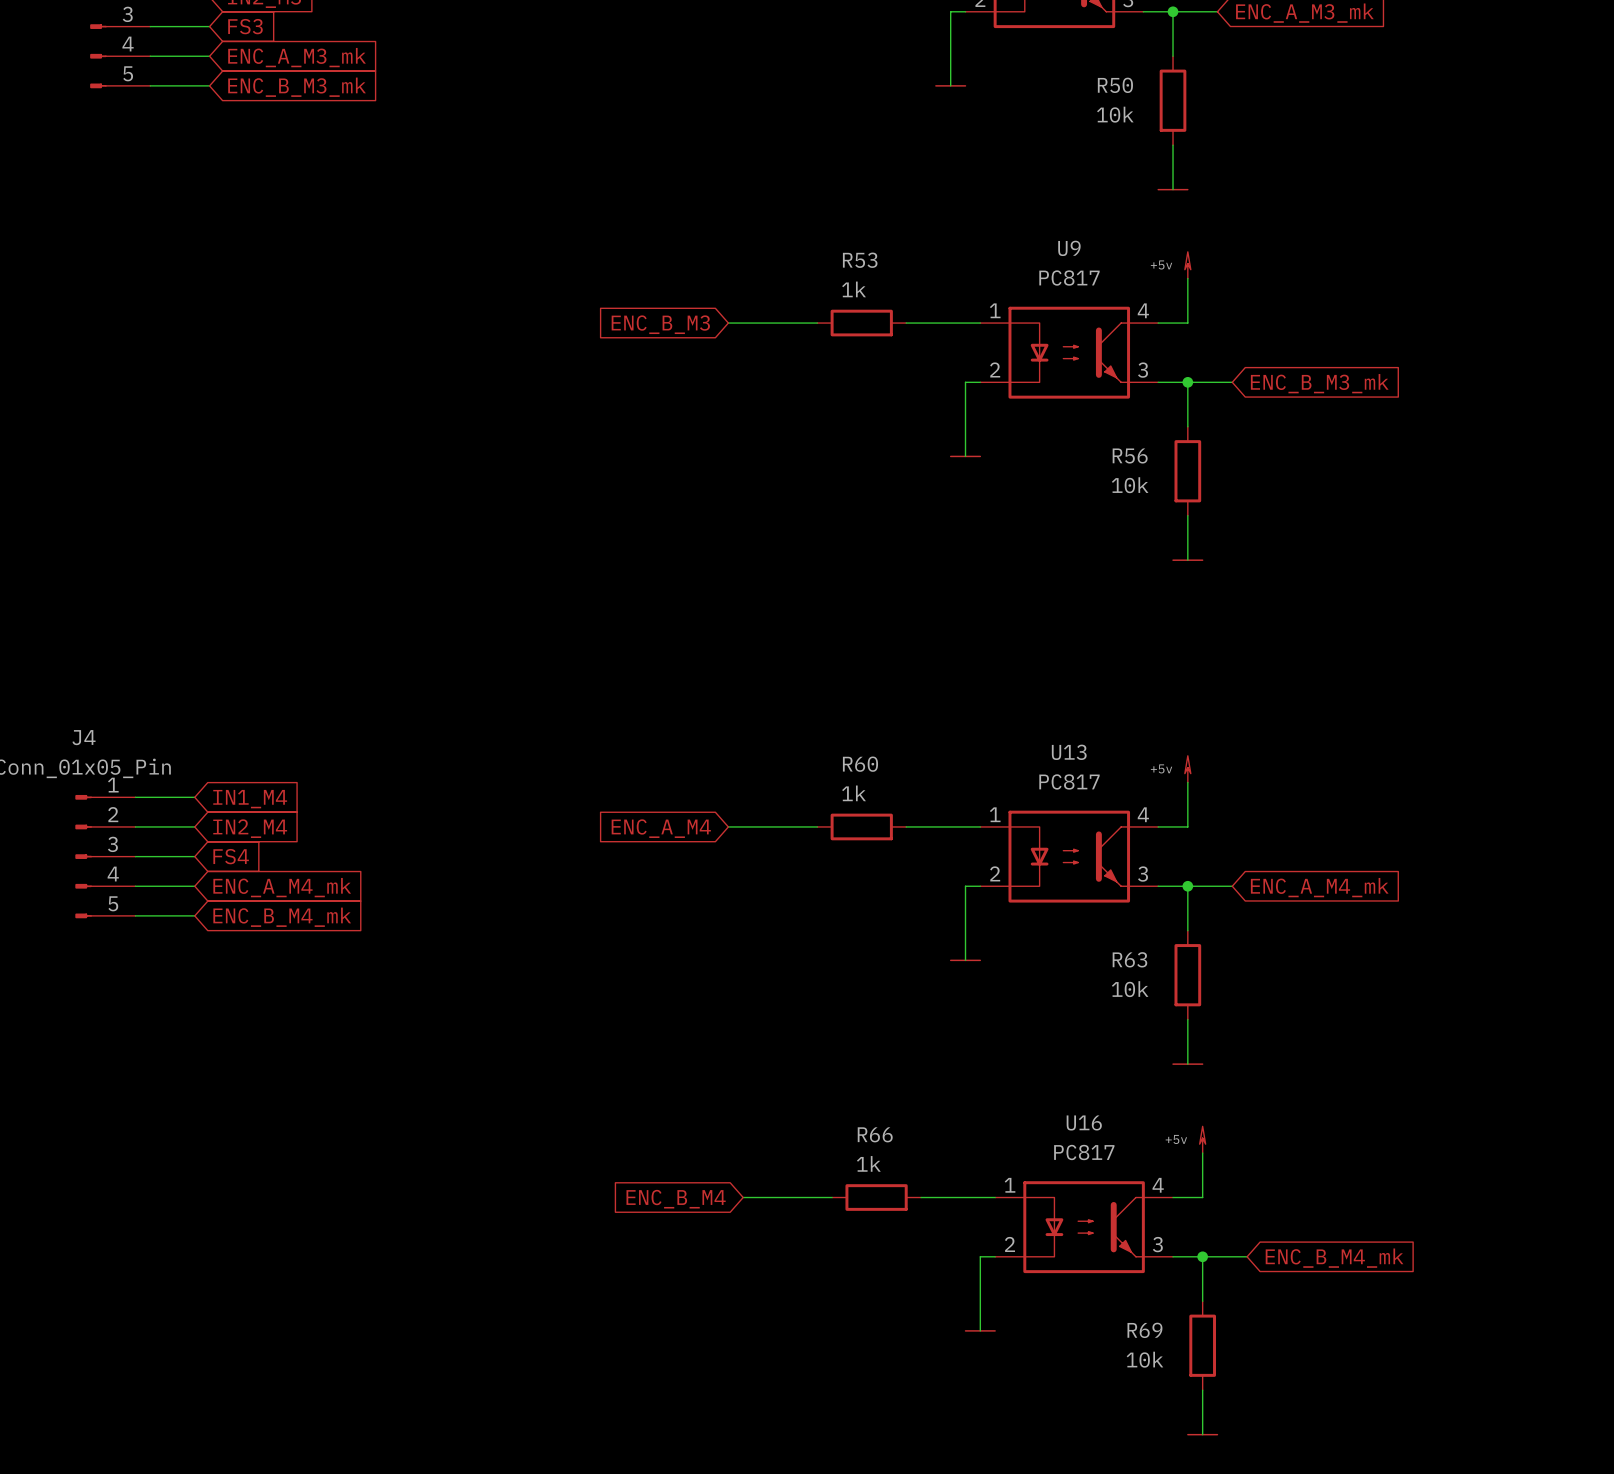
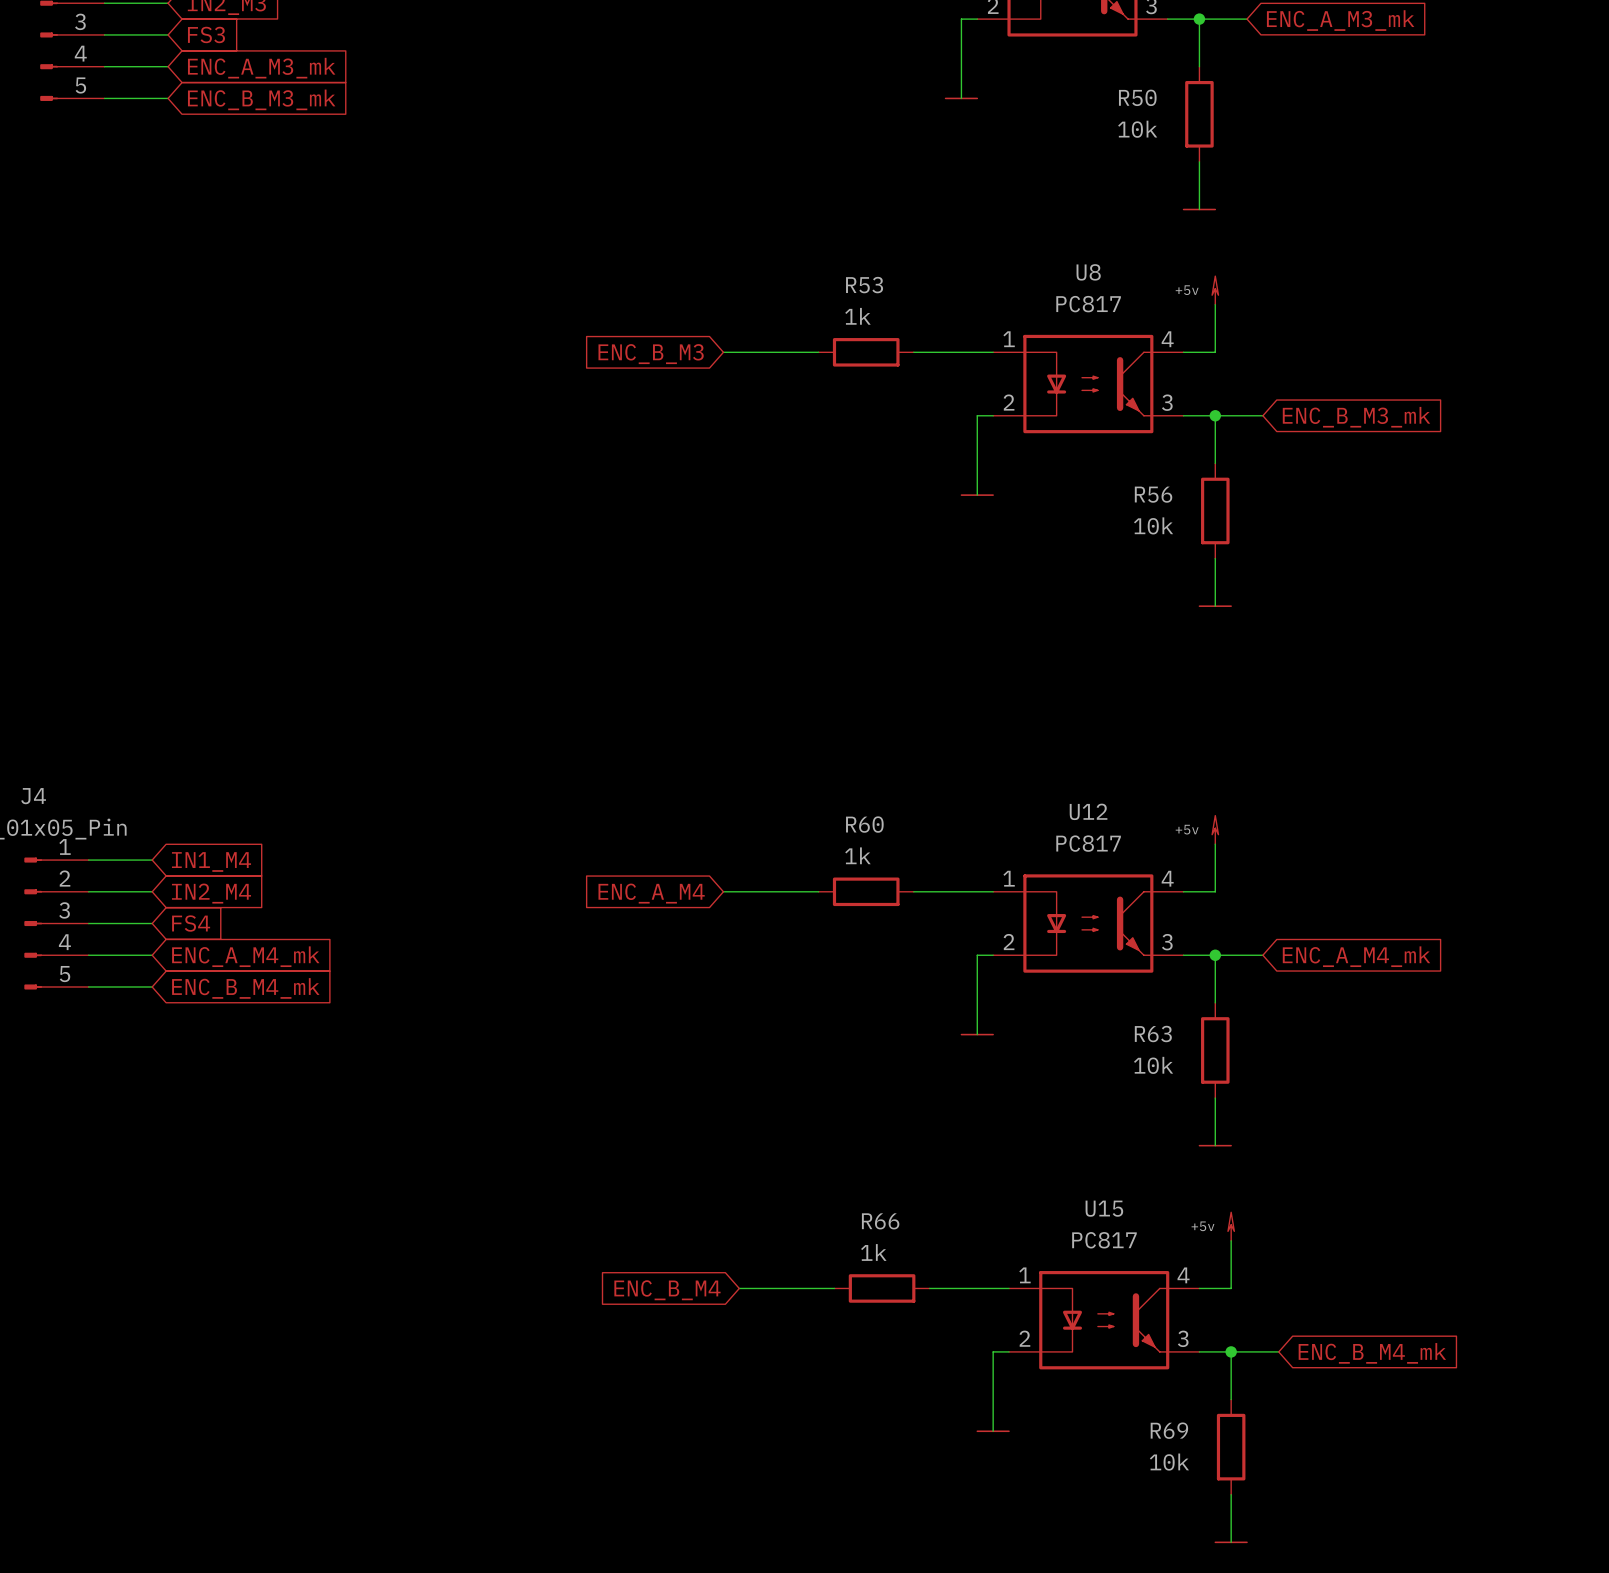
U9 name: U9 (1069, 248) -> U8 (1088, 272)
U13 name: U13 (1069, 752) -> U12 (1088, 811)
U16 name: U16 (1084, 1122) -> U15 (1104, 1208)

